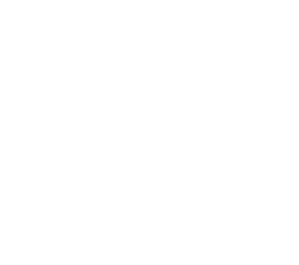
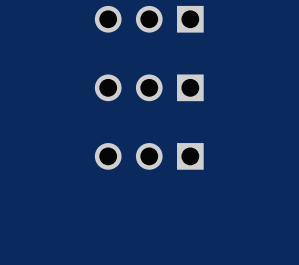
part: none -> (149, 19)
part: none -> (149, 87)
part: none -> (149, 156)

